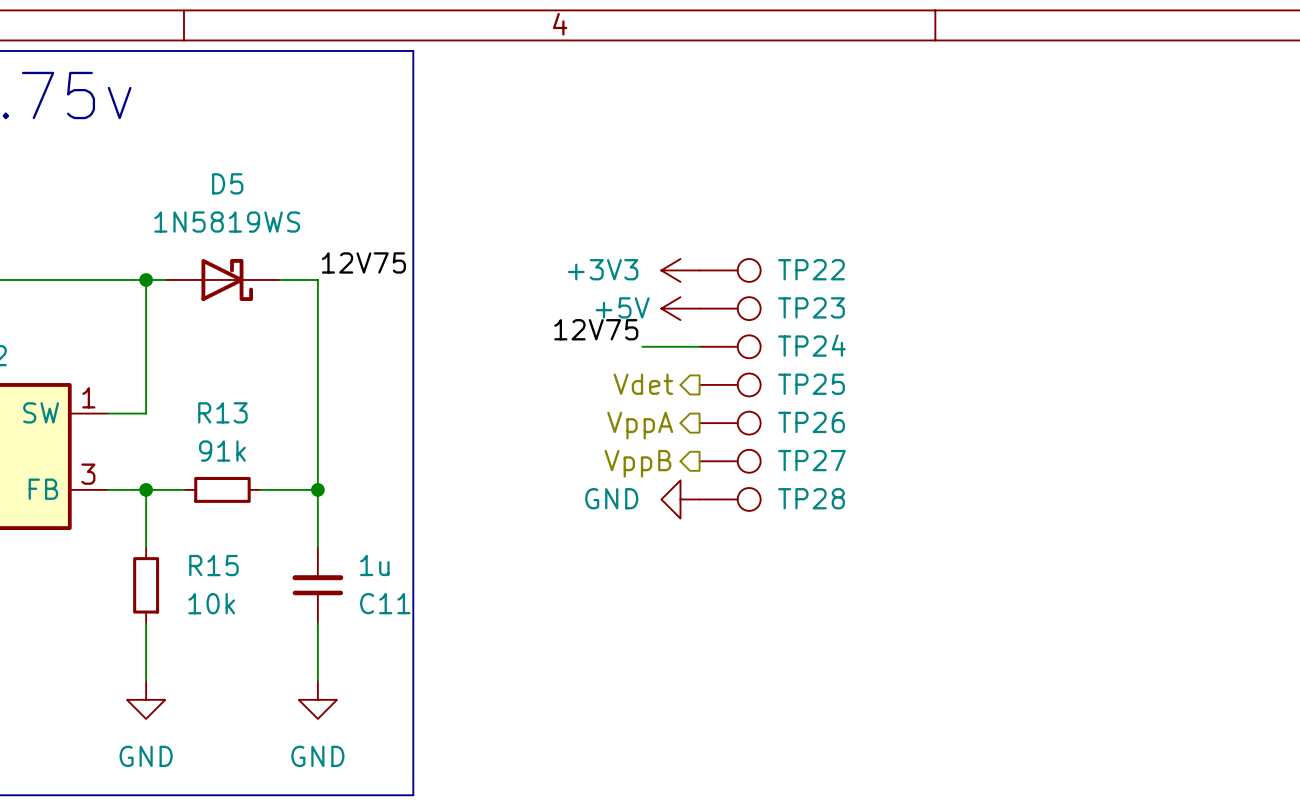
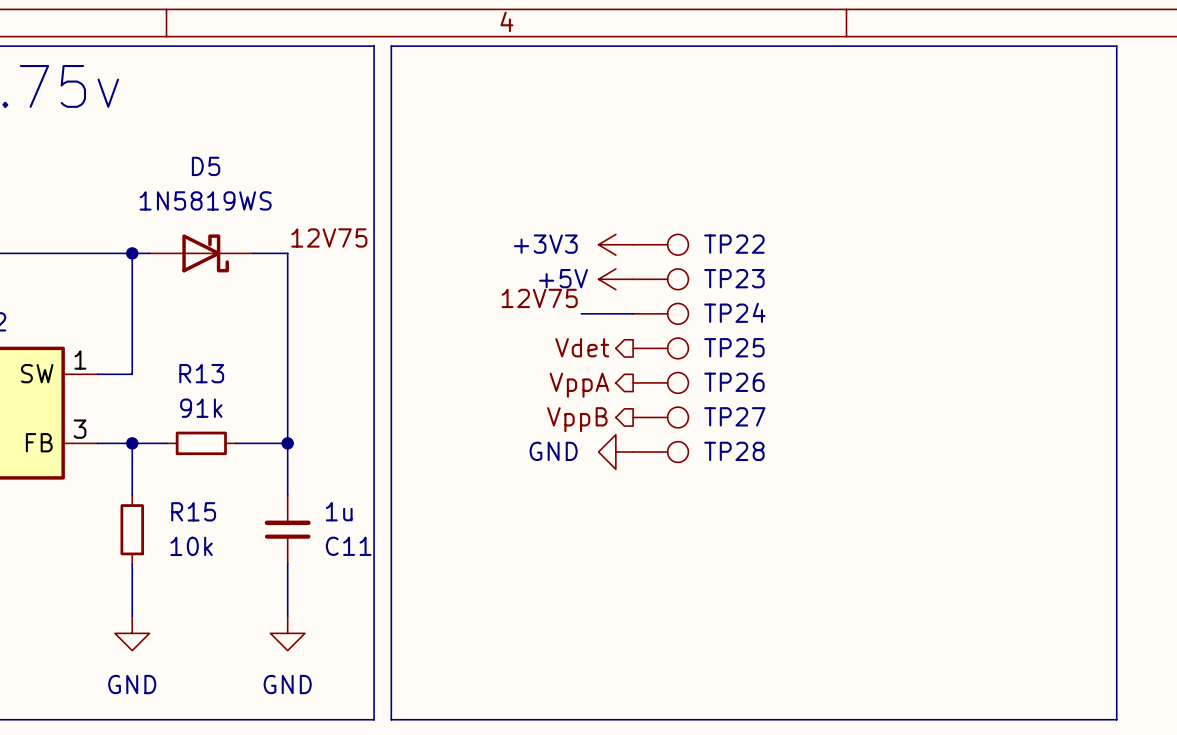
line: none -> (391, 46) (1116, 46) (1116, 719) (391, 719) (391, 46)

